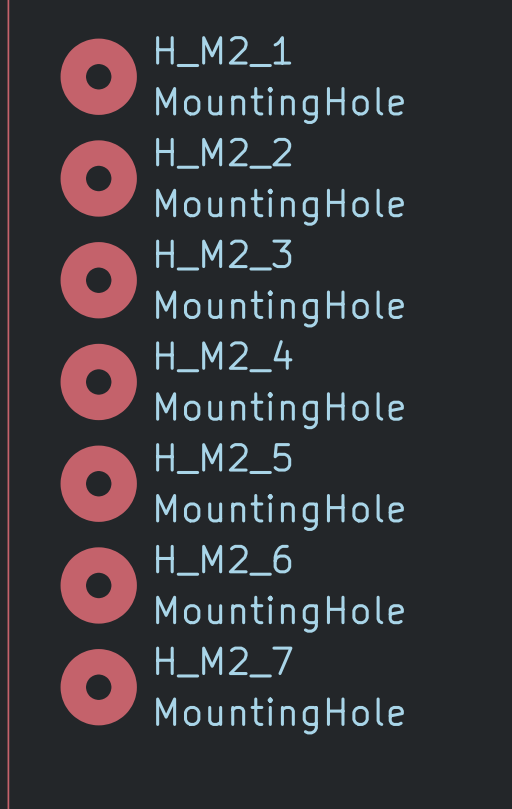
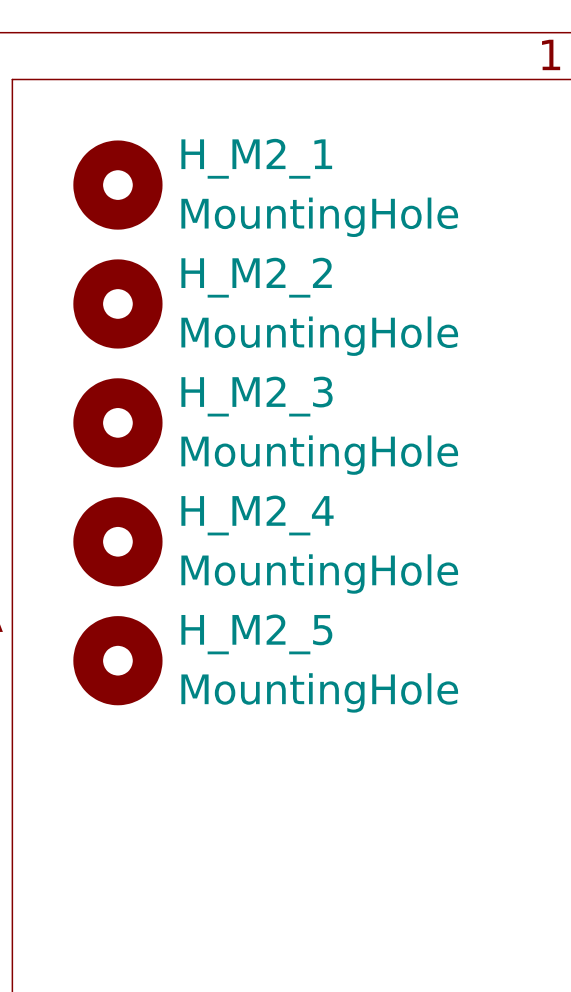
H_M2_6: MountingHole (98, 585) -> none
H_M2_7: MountingHole (98, 687) -> none

